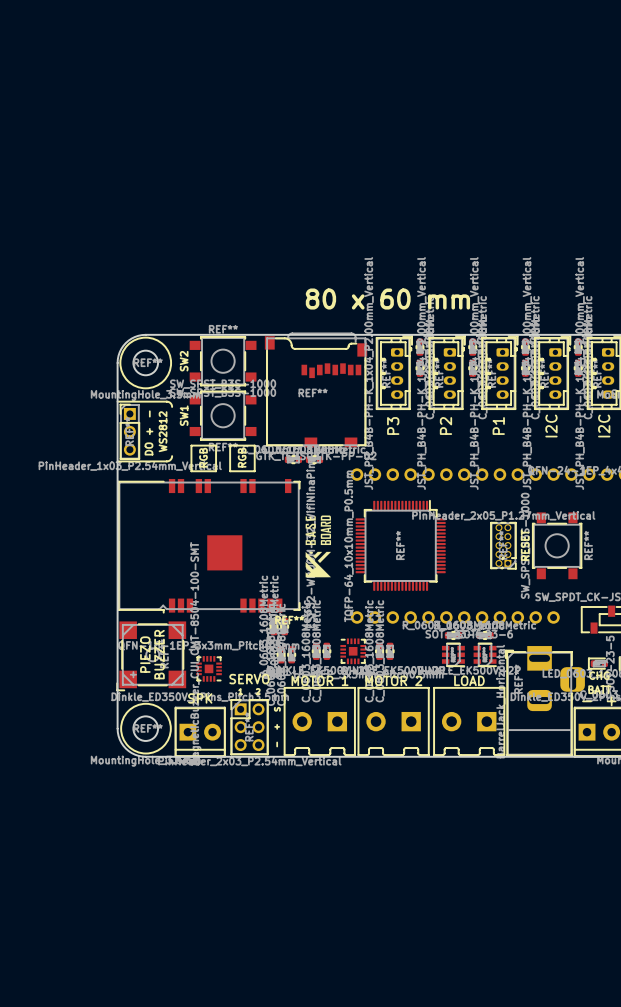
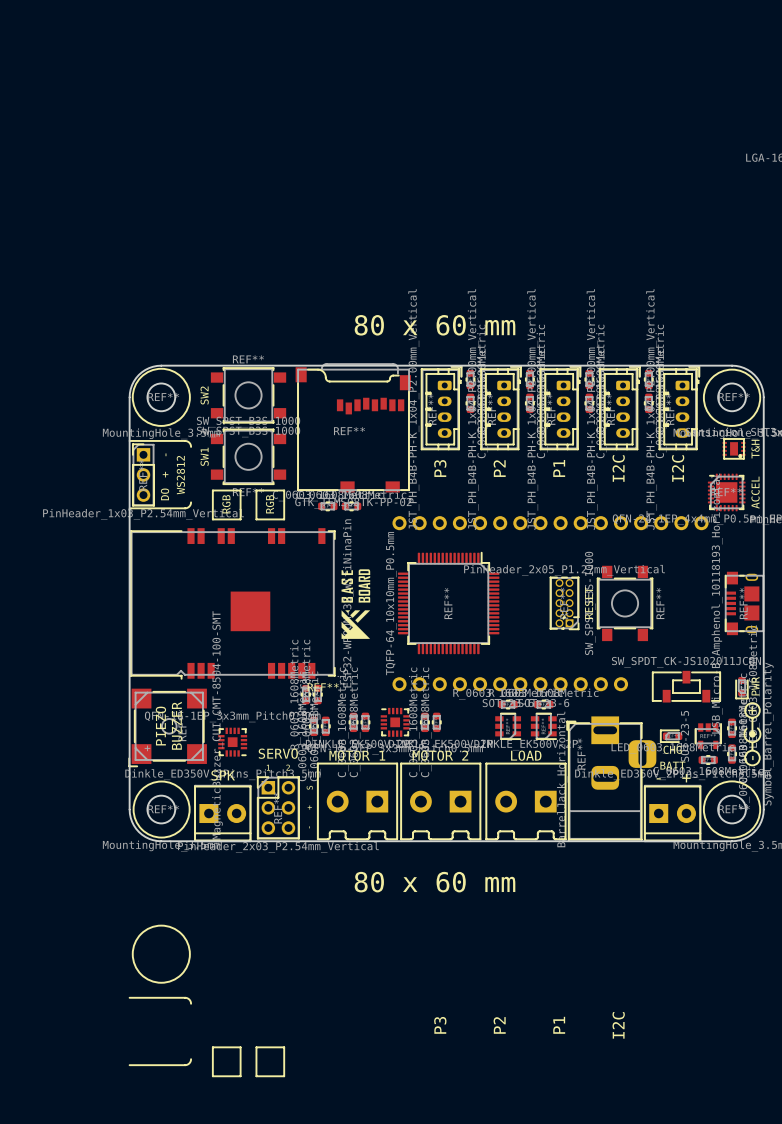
text: none -> 80 x 60 mm (435, 882)
drawing: none -> [132, 925, 191, 984]
line: none -> (129, 997) (185, 997) (191, 1003)
text: none -> P3 (440, 1025)
text: none -> P2 (499, 1025)
text: none -> P1 (559, 1025)
text: none -> I2C (618, 1025)
line: none -> (212, 1047) (240, 1047) (240, 1076) (212, 1076) (212, 1047)
line: none -> (256, 1047) (284, 1047) (284, 1076) (256, 1076) (256, 1047)
line: none -> (191, 1059) (185, 1065) (129, 1065)

